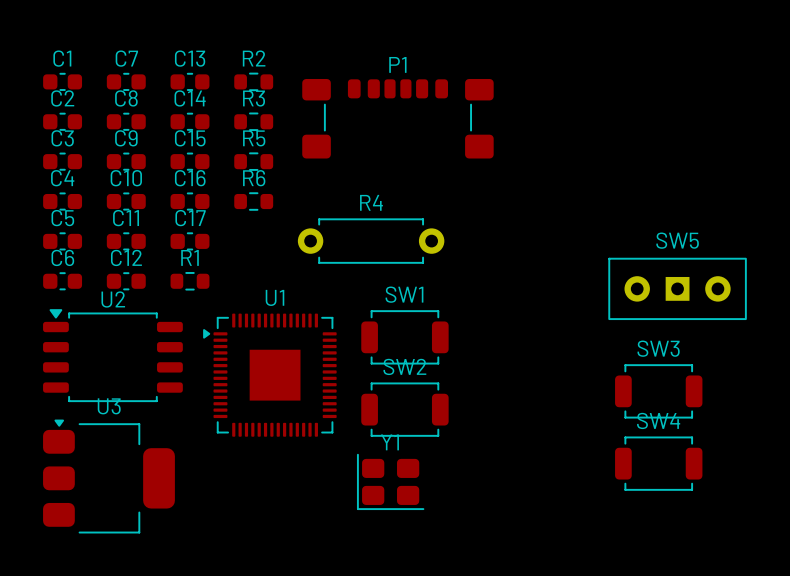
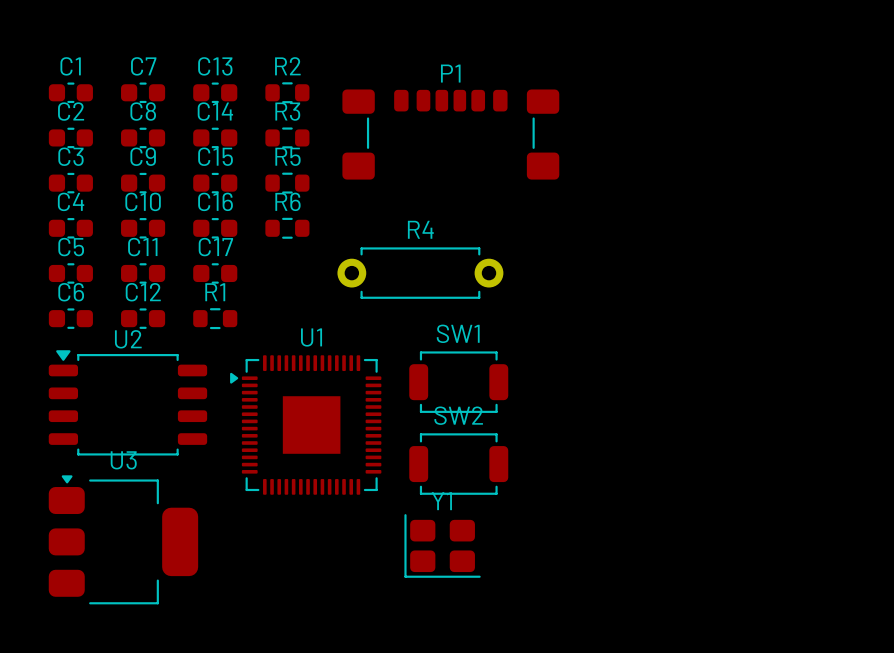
SW5: (677, 288) -> none
SW3: (658, 391) -> none
SW4: (658, 463) -> none

